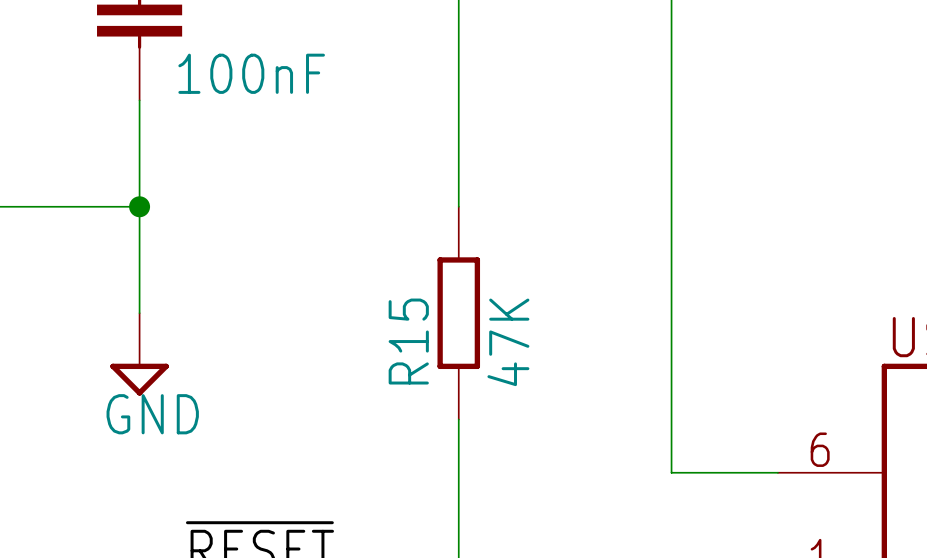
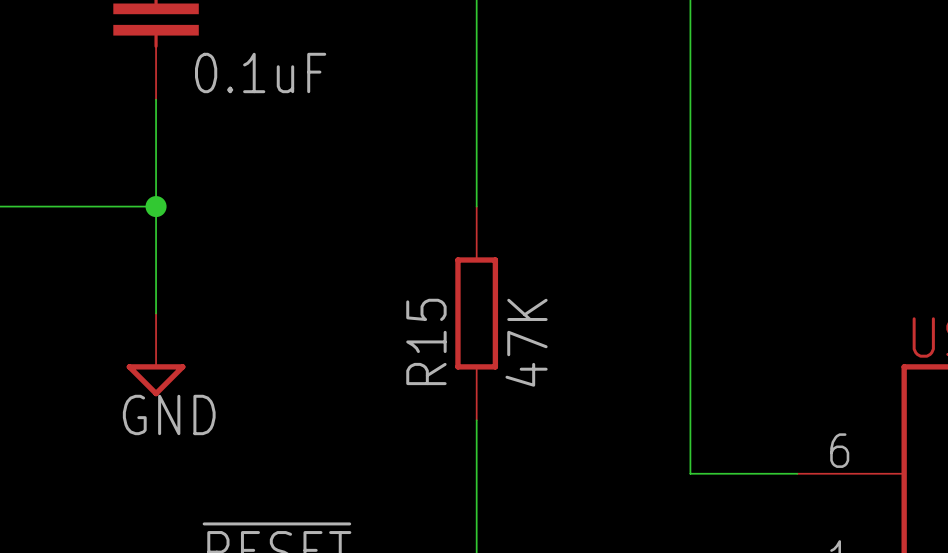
part value: 100nF (251, 73) -> 0.1uF (260, 72)

